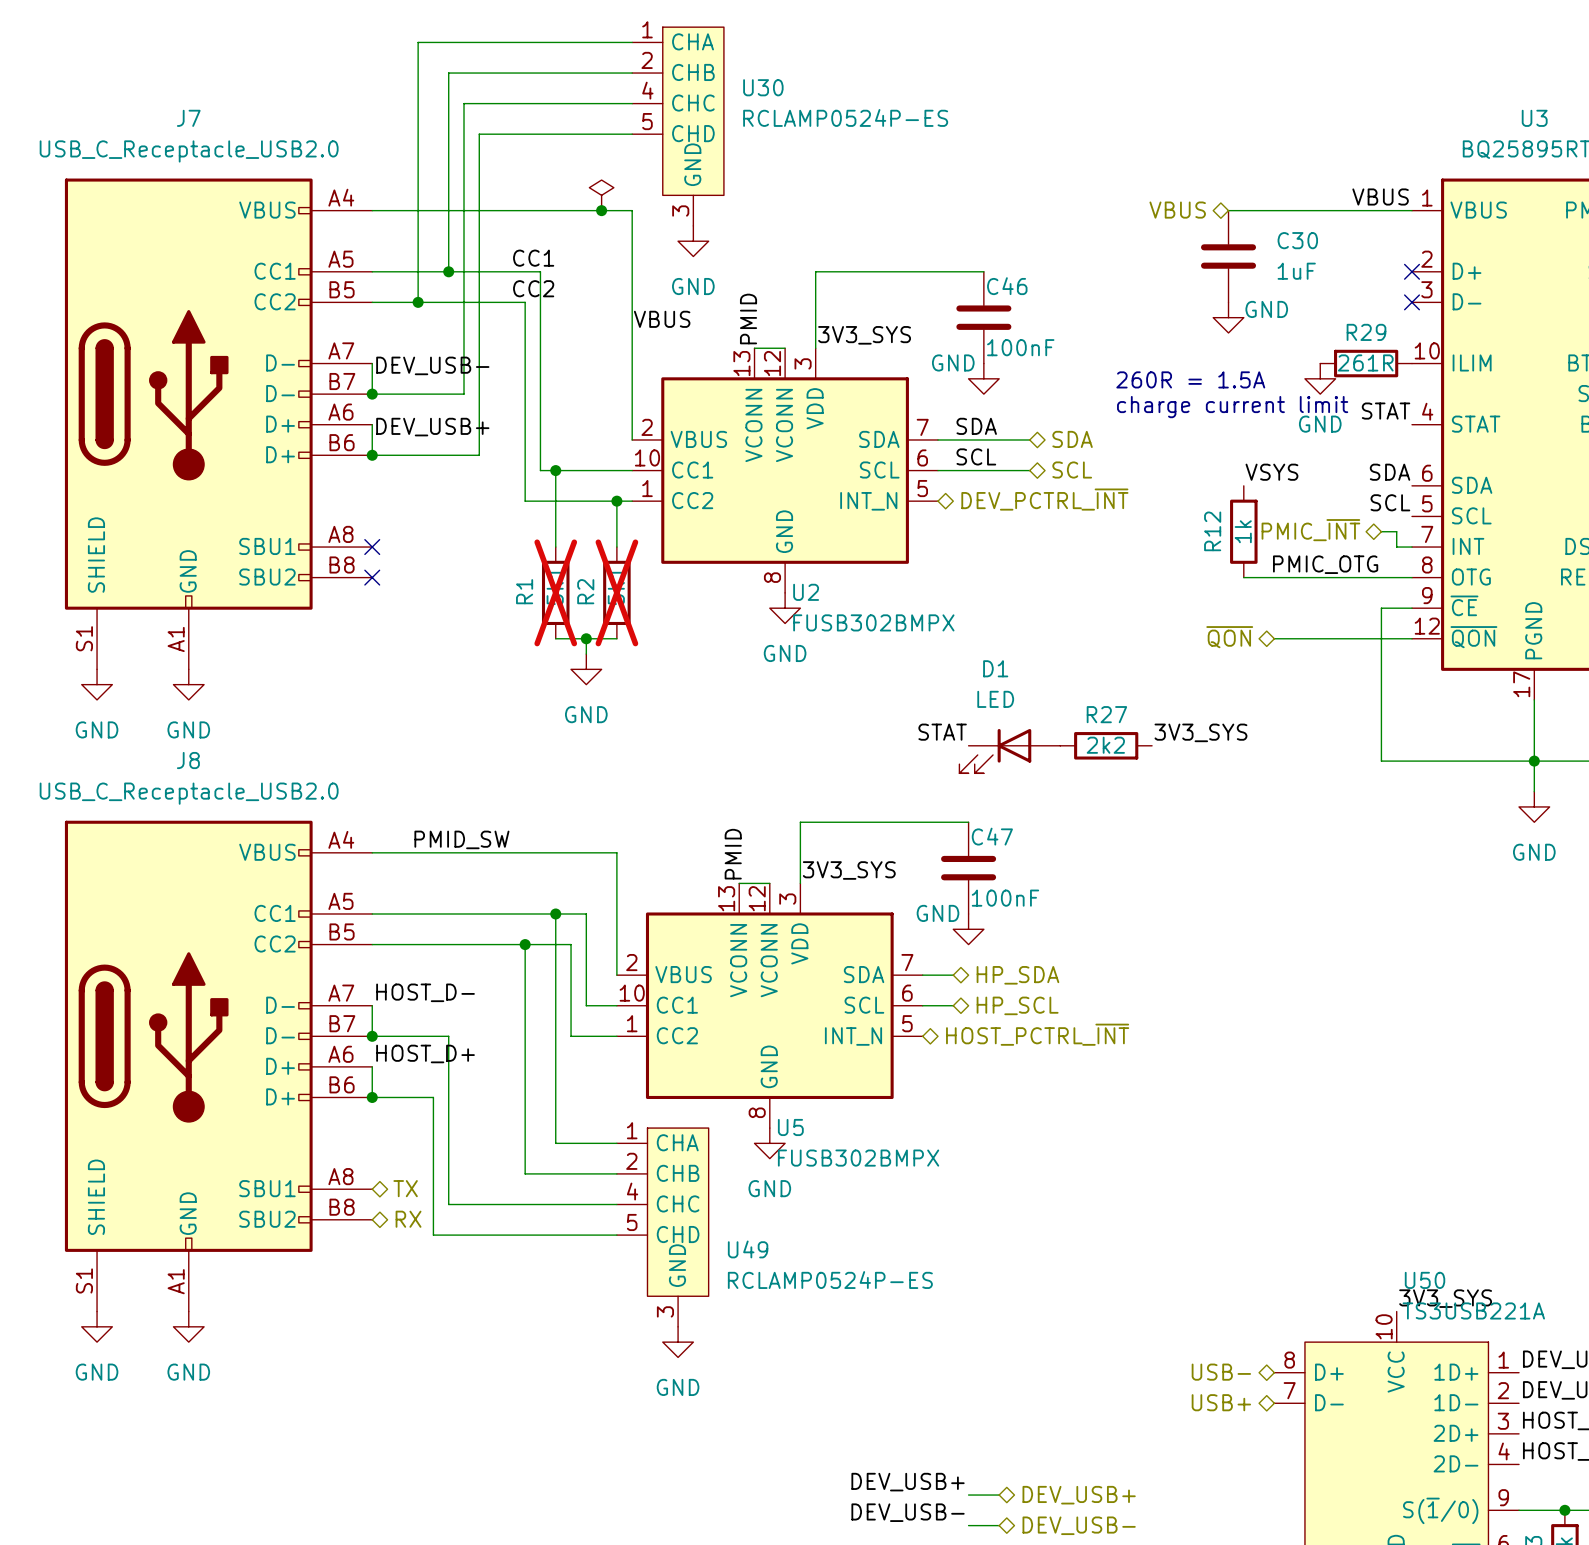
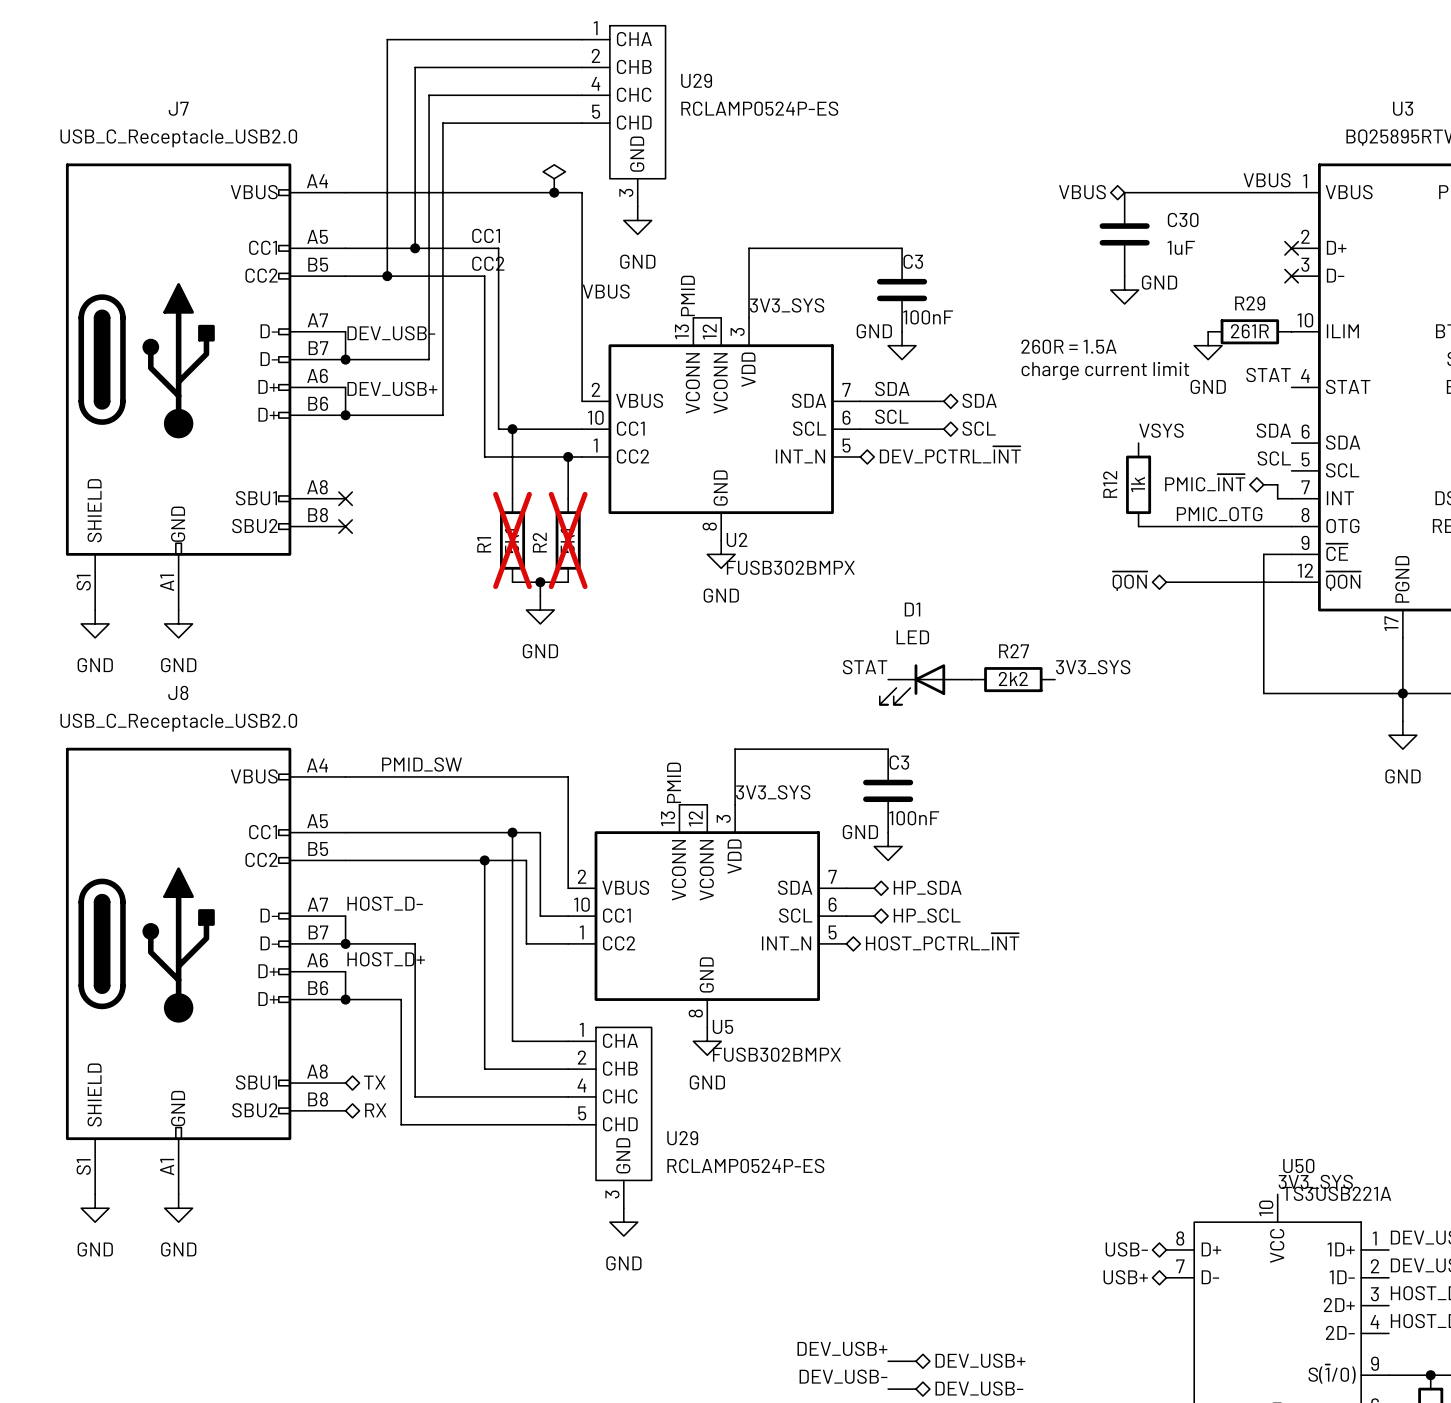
U30 name: U30 (763, 87) -> U29 (696, 80)
C46 name: C46 (1007, 286) -> C3 (913, 261)
C47 name: C47 (992, 836) -> C3 (899, 762)
U49 name: U49 (748, 1249) -> U29 (682, 1138)

